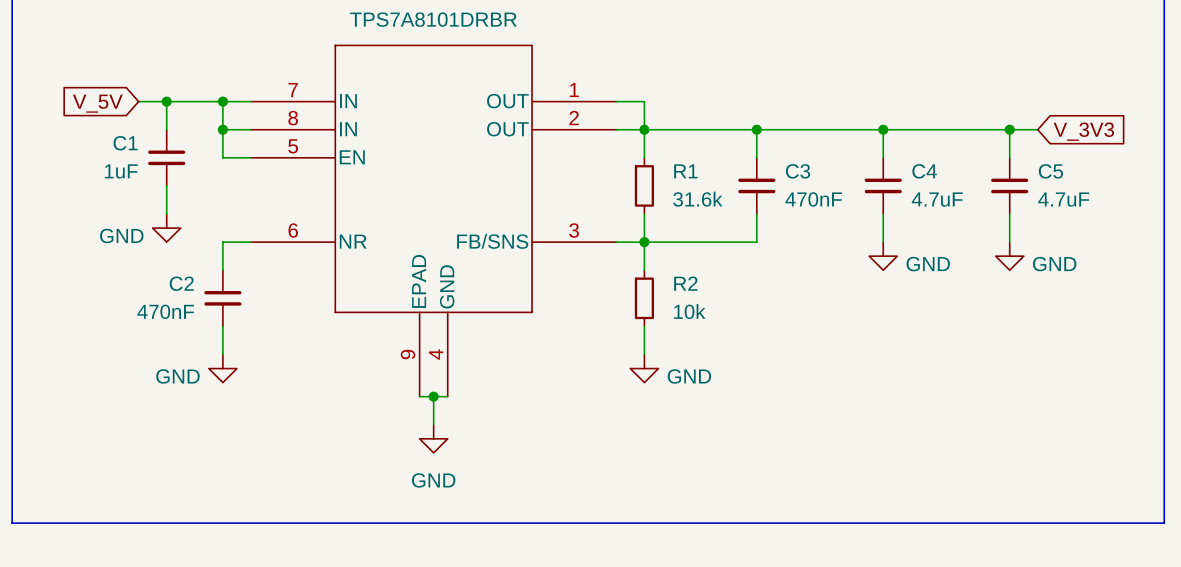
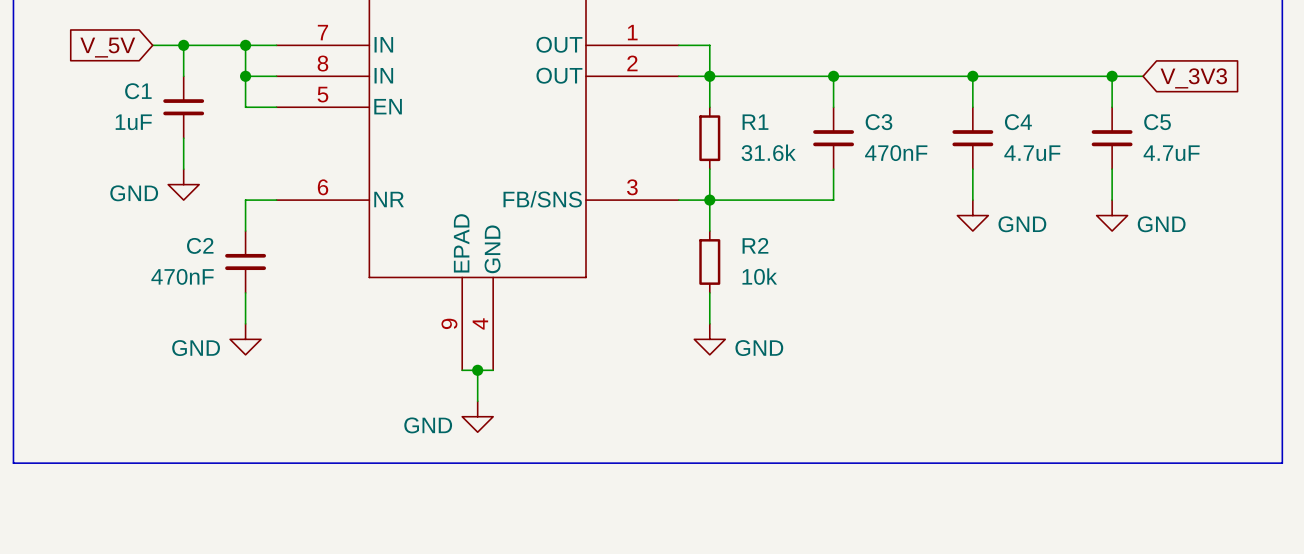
line: (12, 480) (12, 523) (1164, 523) (1164, 480) -> (13, 463) (1282, 463)
power symbol text position: GND (433, 480) -> GND (428, 425)

